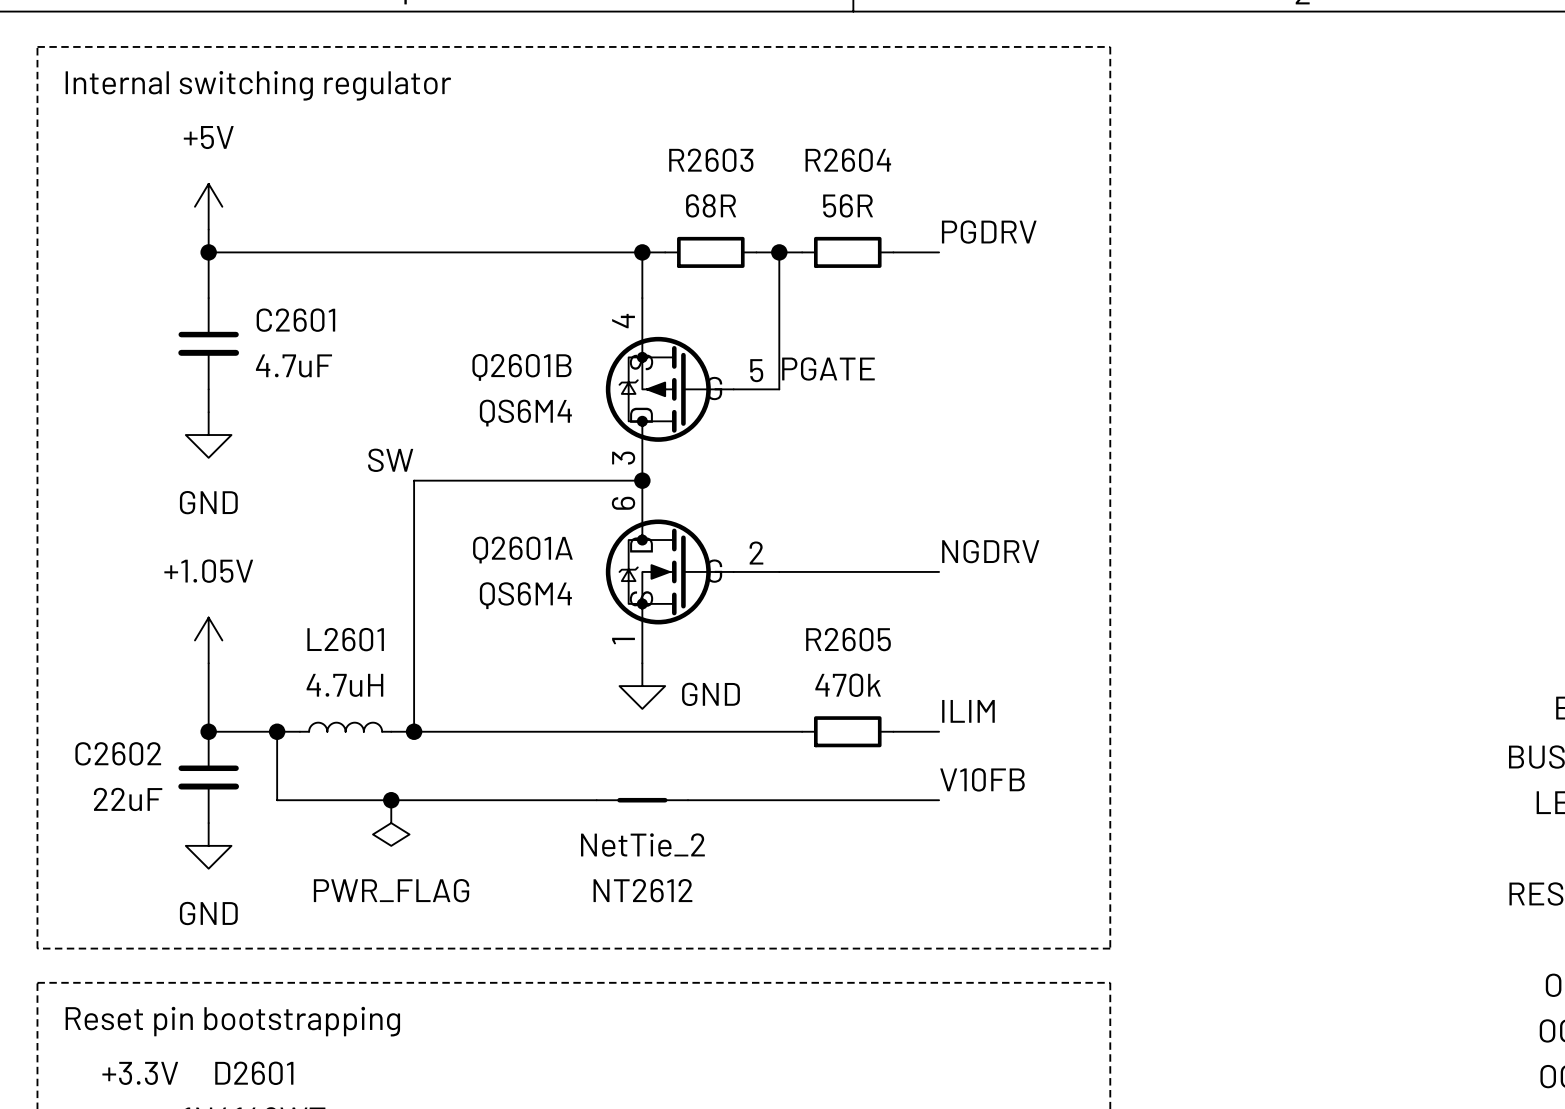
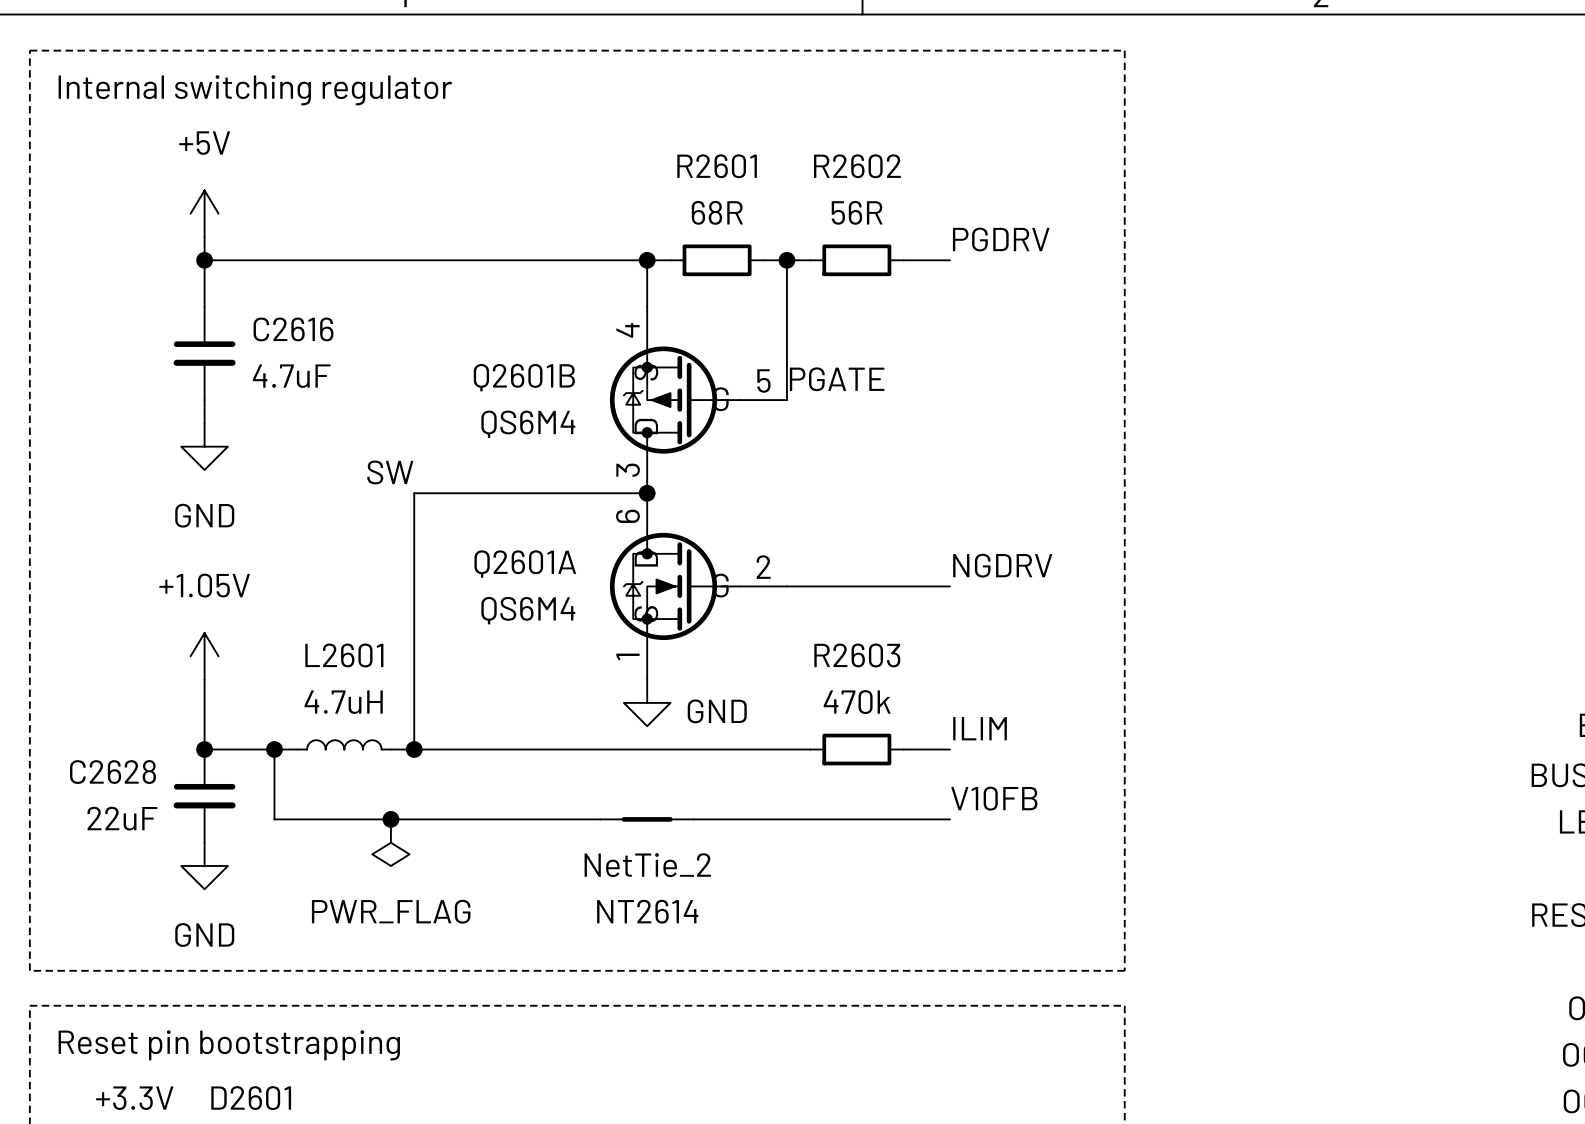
R2603 name: R2603 (711, 160) -> R2601 (717, 166)
R2604 name: R2604 (848, 160) -> R2602 (857, 166)
C2601 name: C2601 (295, 320) -> C2616 (293, 329)
R2605 name: R2605 (848, 639) -> R2603 (857, 655)
C2602 name: C2602 (118, 753) -> C2628 (112, 772)
NT2612 name: NT2612 (642, 890) -> NT2614 (647, 911)

